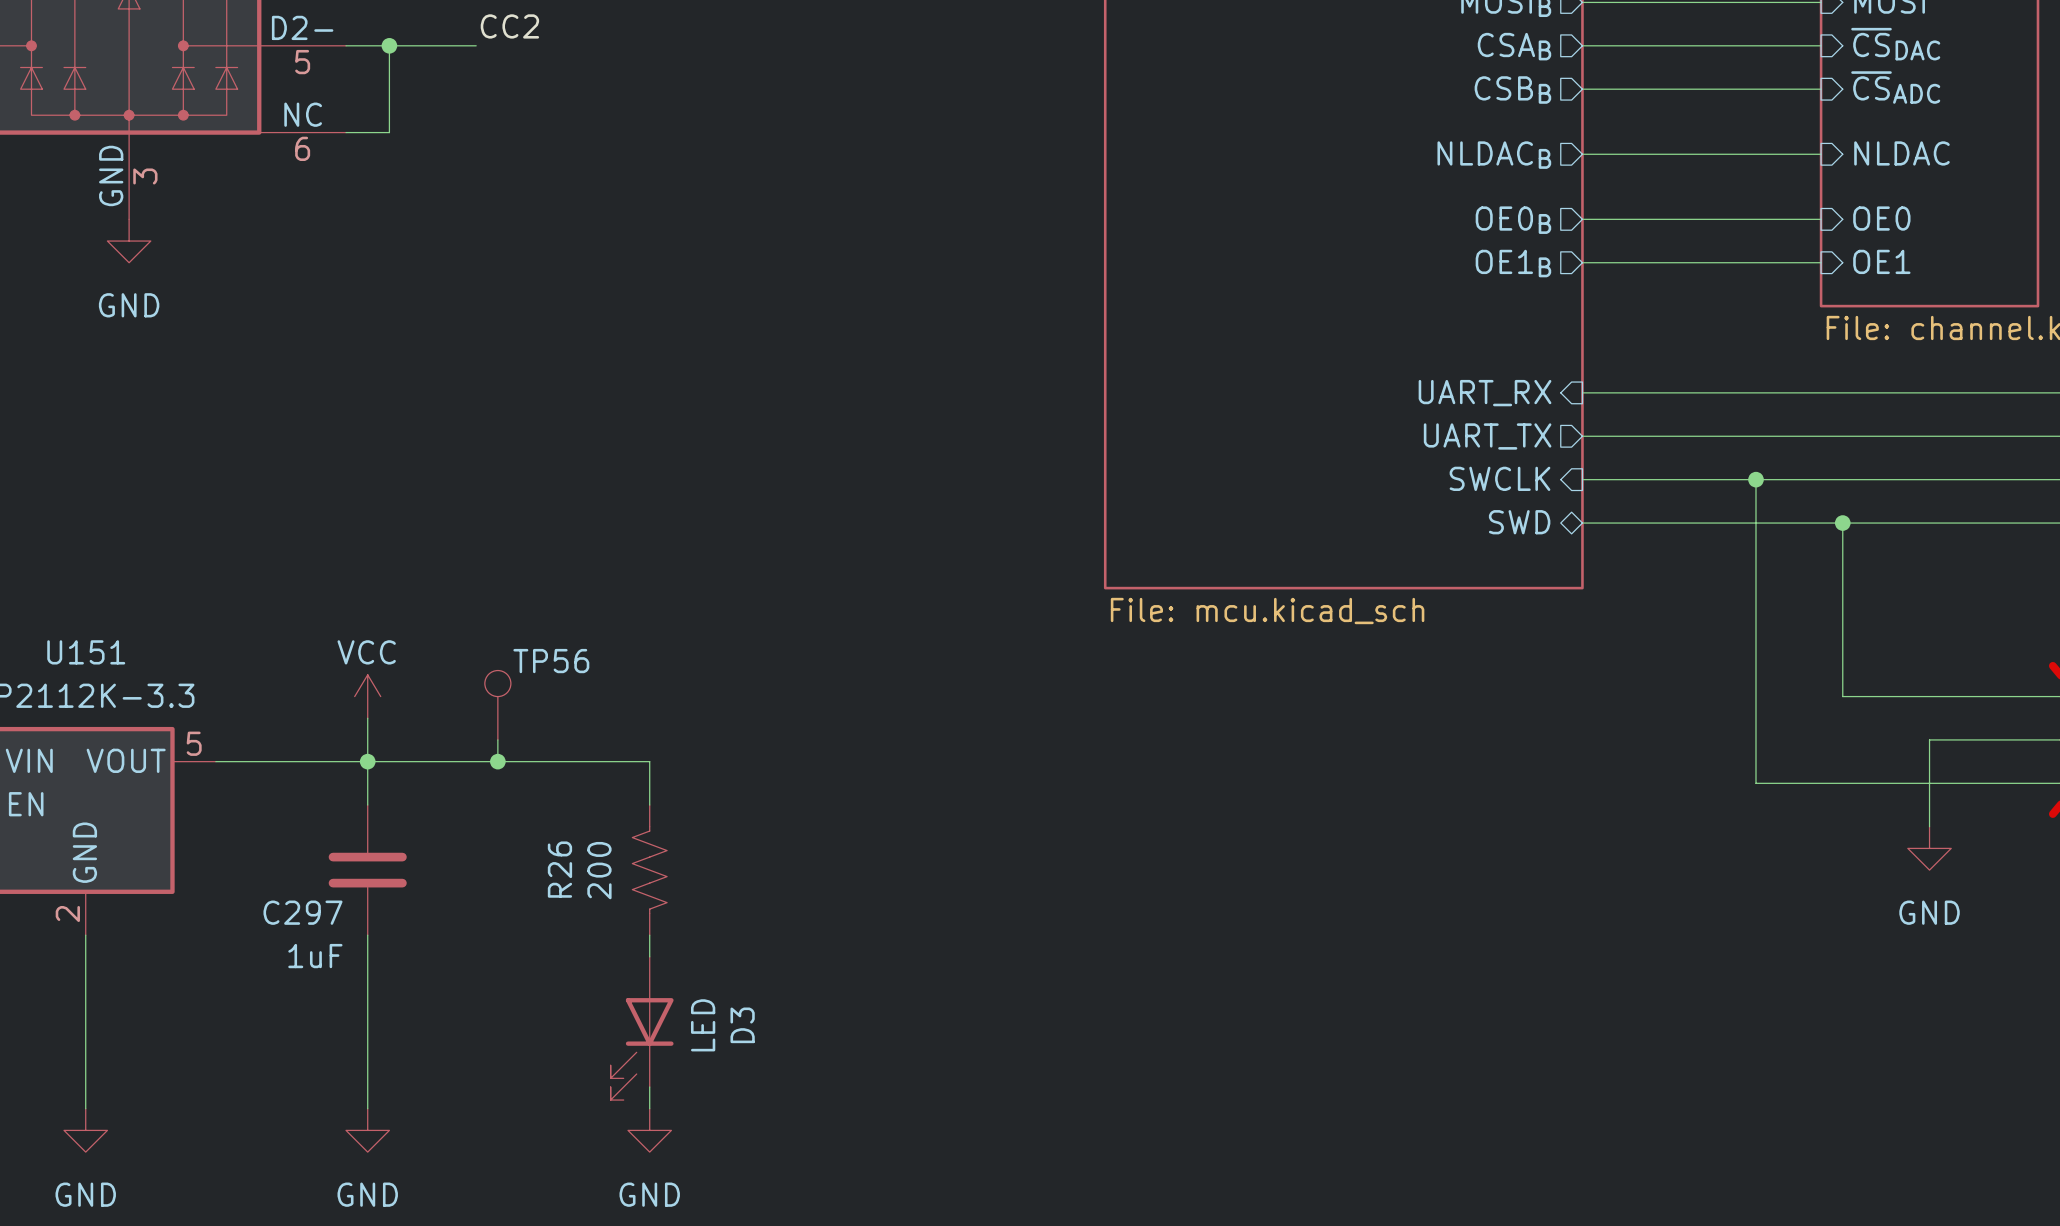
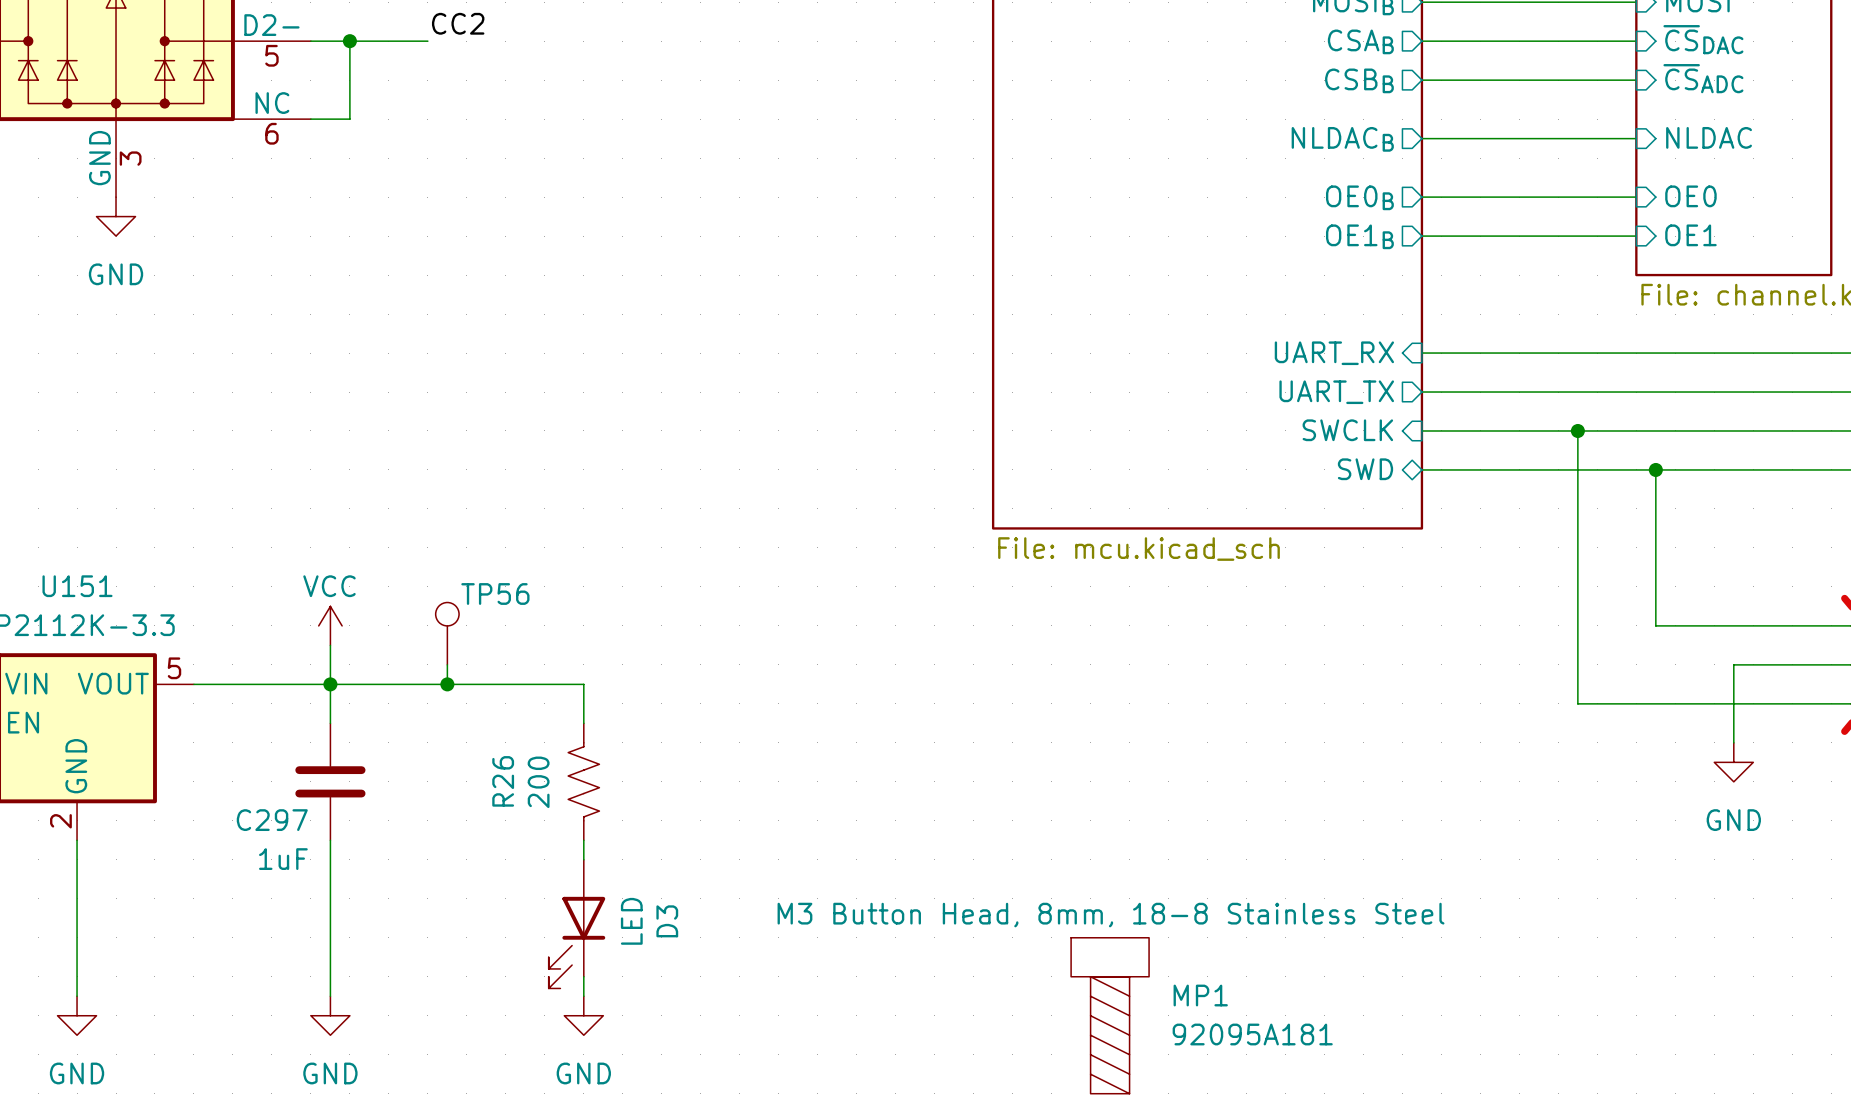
MP1: none -> 92095A181 (1110, 1015)

